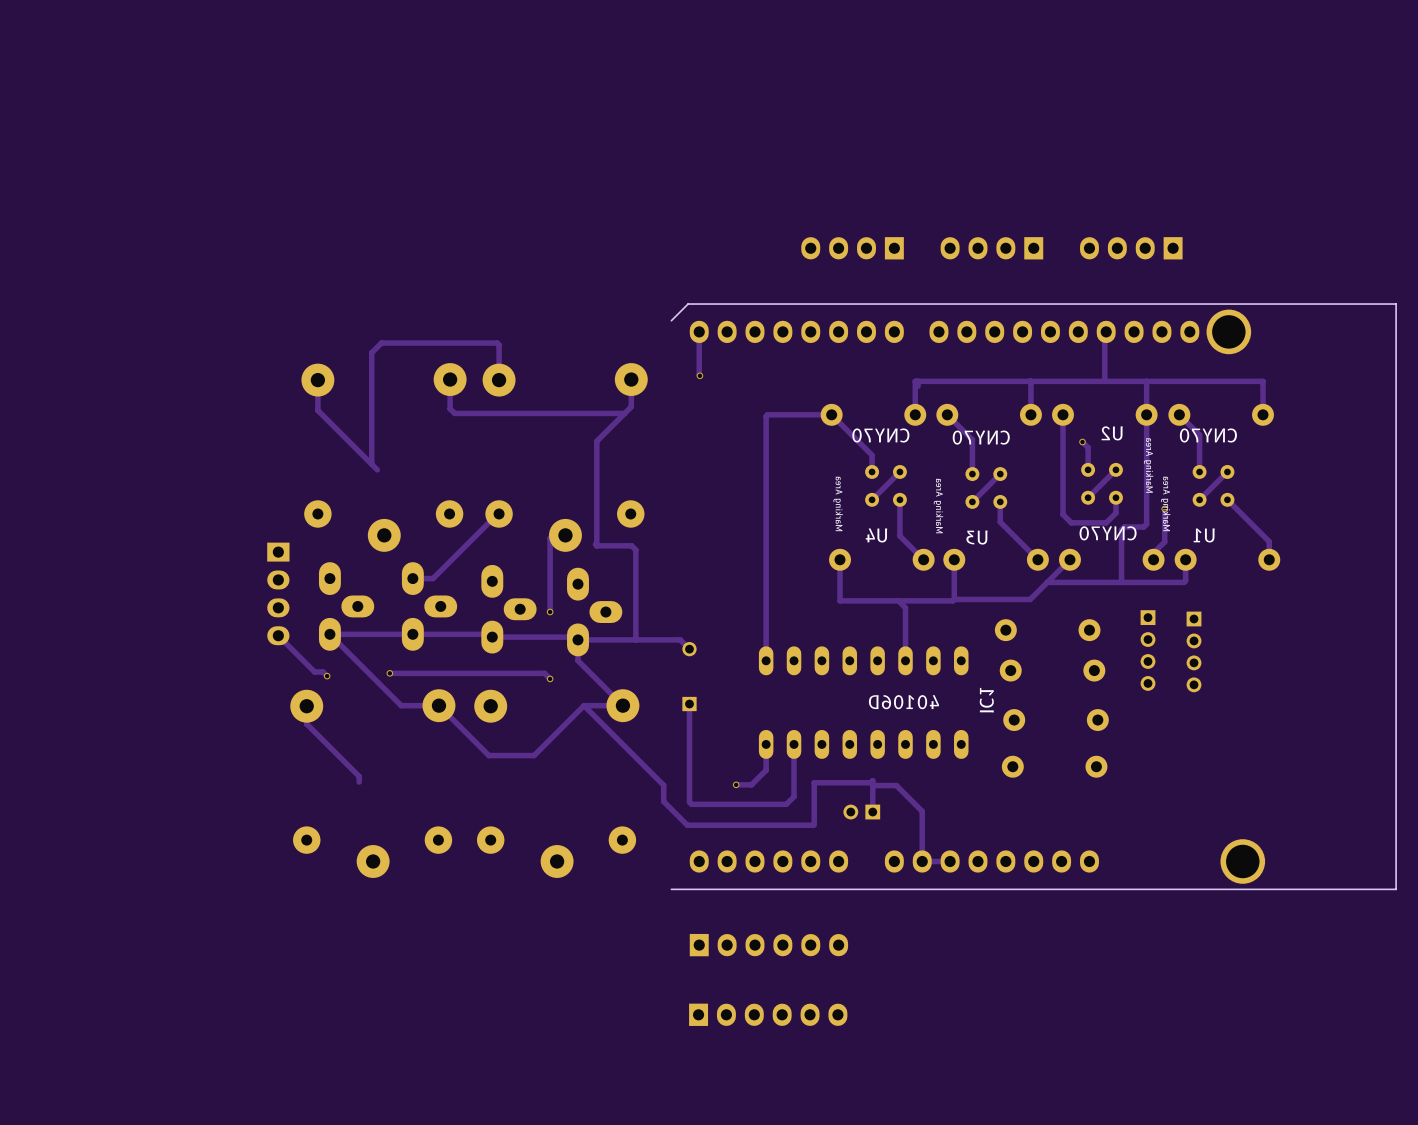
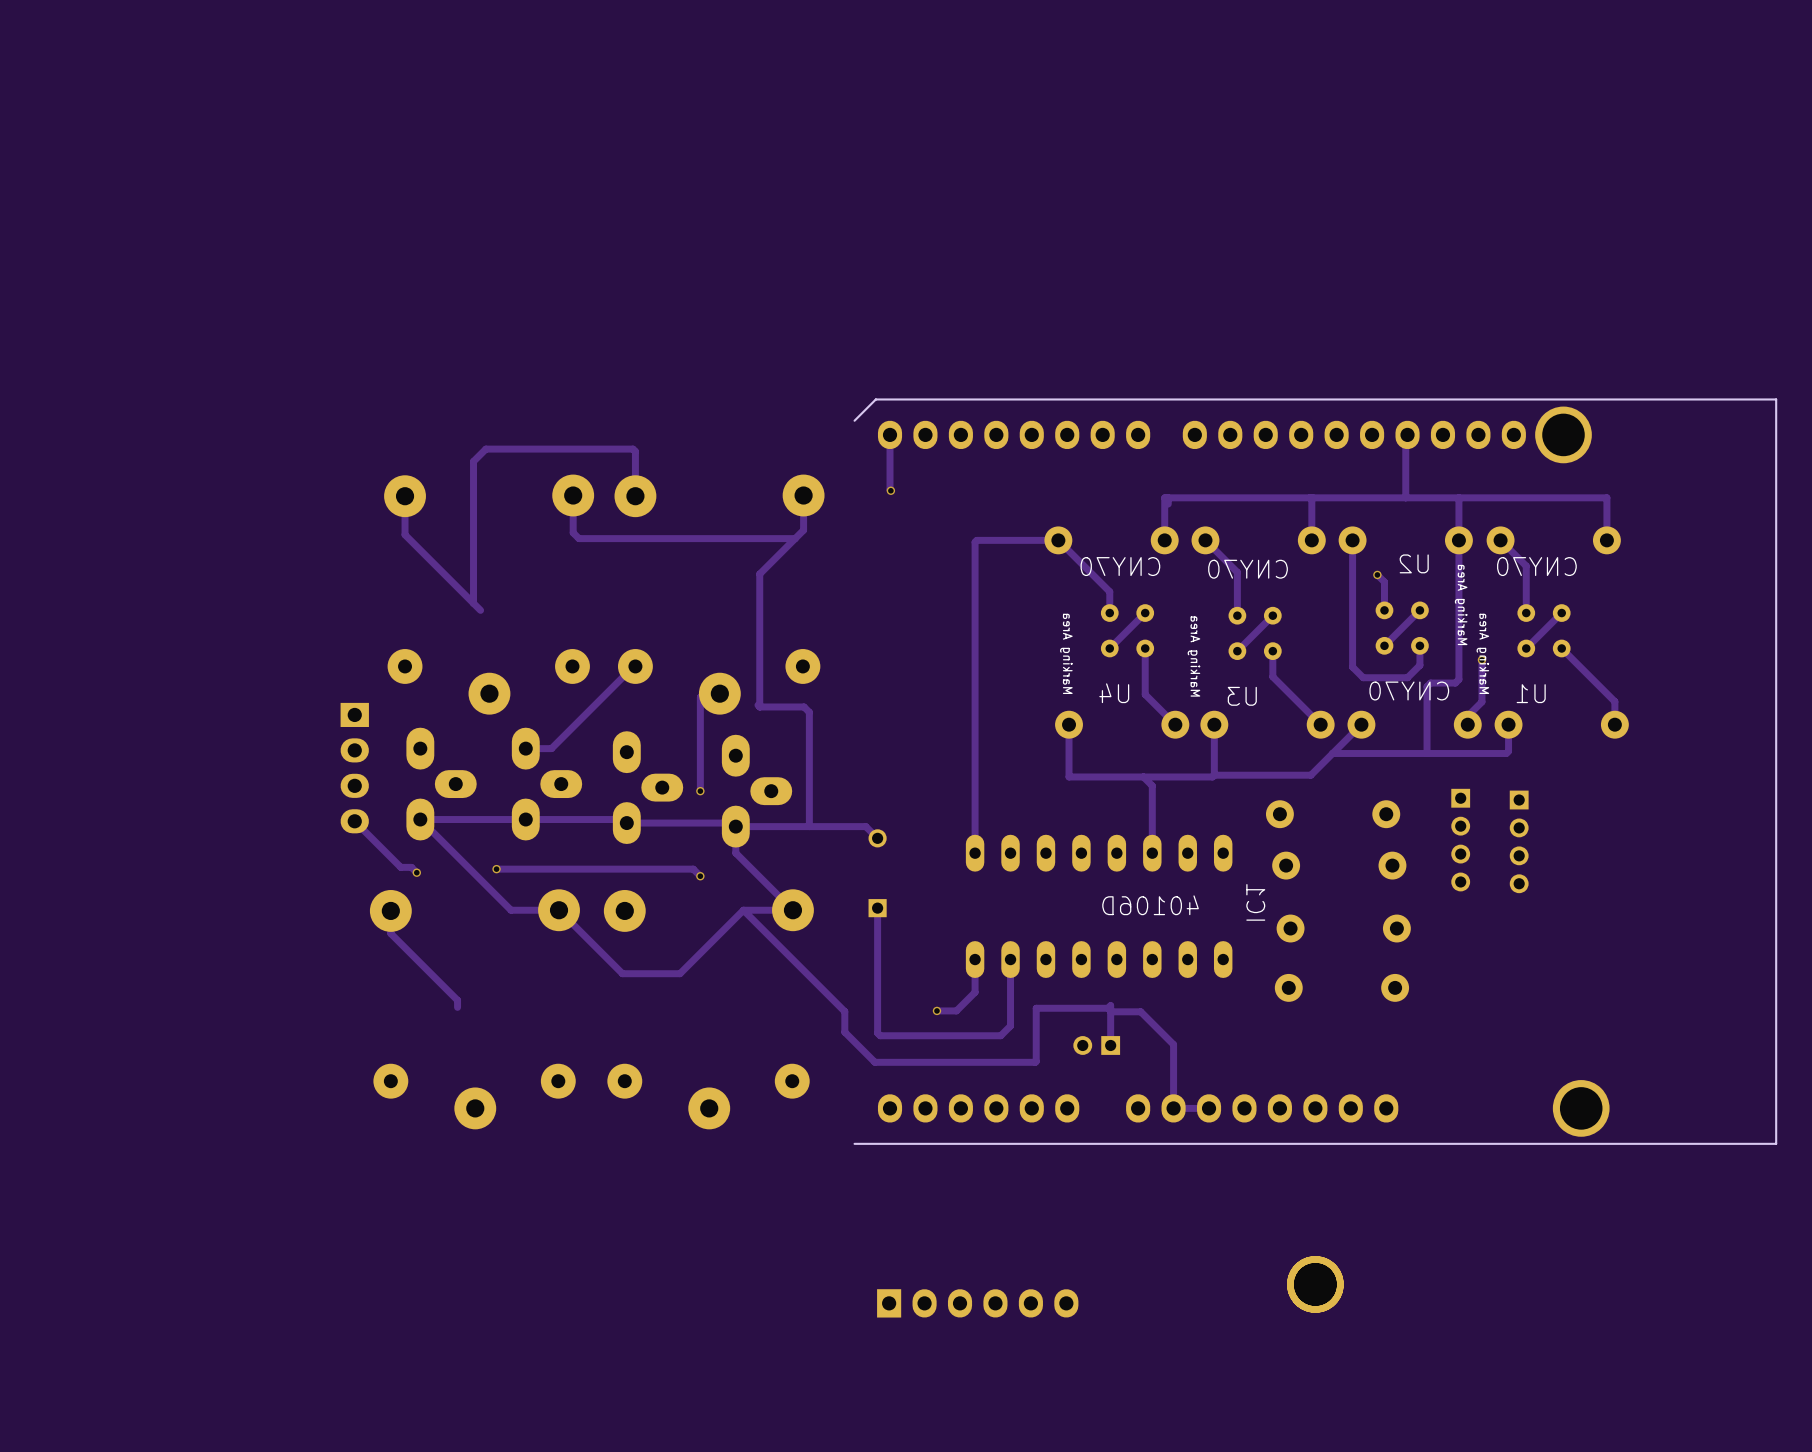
part: (852, 248) -> none
part: (991, 248) -> none
part: (1131, 248) -> none
part: (768, 945) -> none
part: none -> (1315, 1284)

